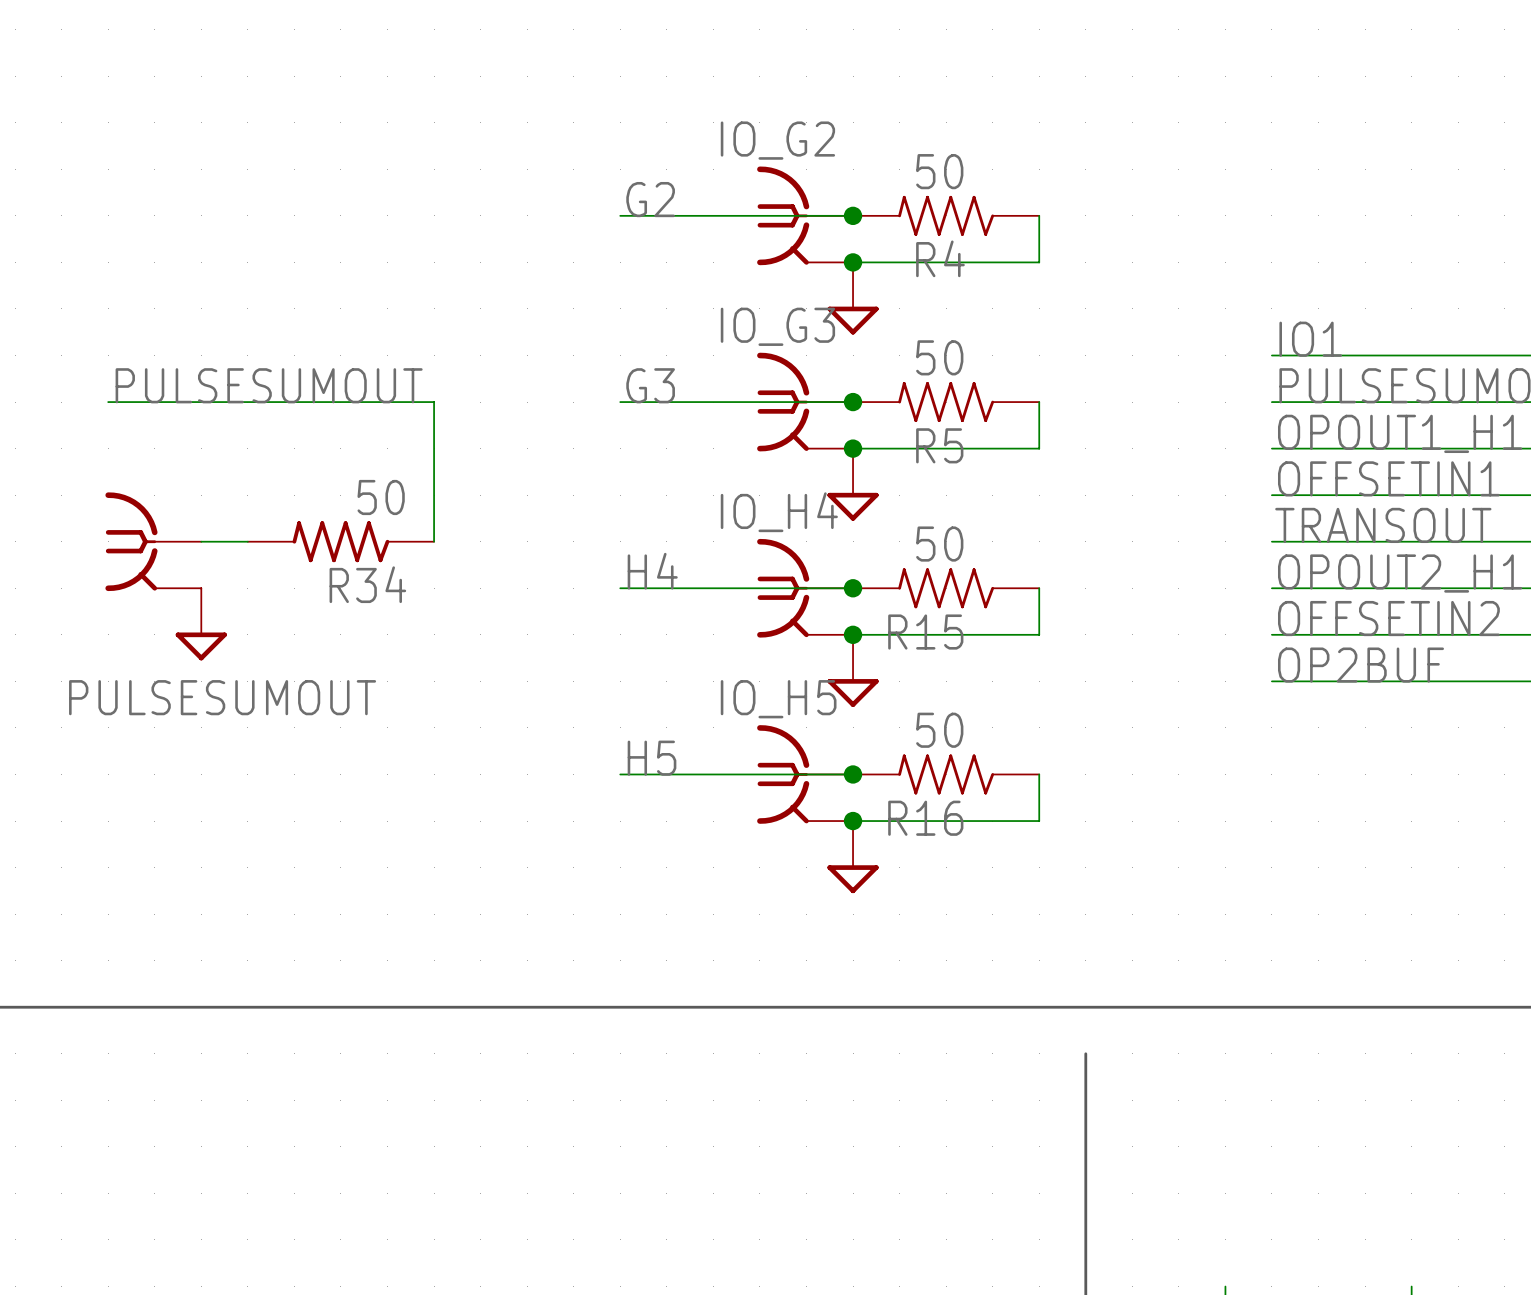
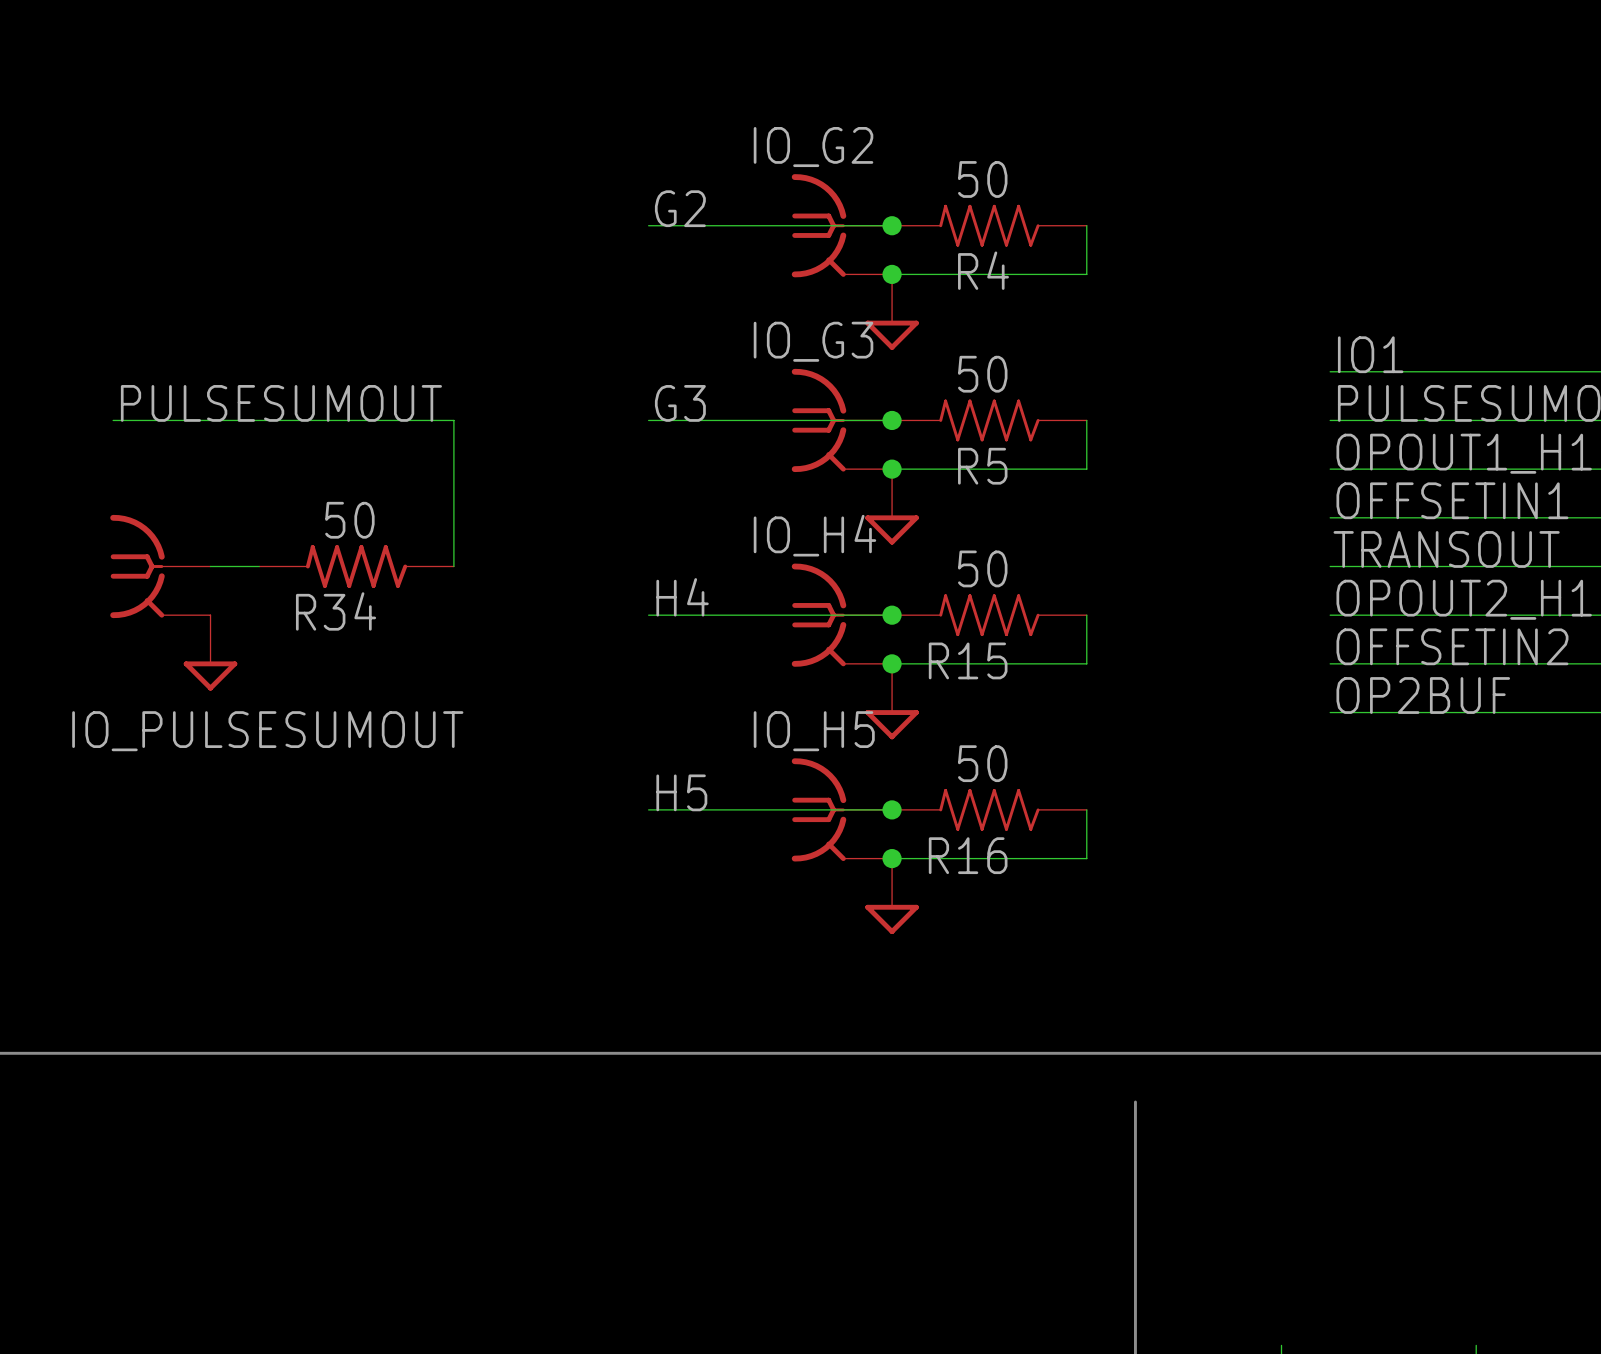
R34 value position: 50 (381, 497) -> 50 (349, 520)
R34 name position: R34 (367, 584) -> R34 (336, 611)
PULSESUMOUT name: PULSESUMOUT (222, 697) -> IO_PULSESUMOUT (267, 731)

